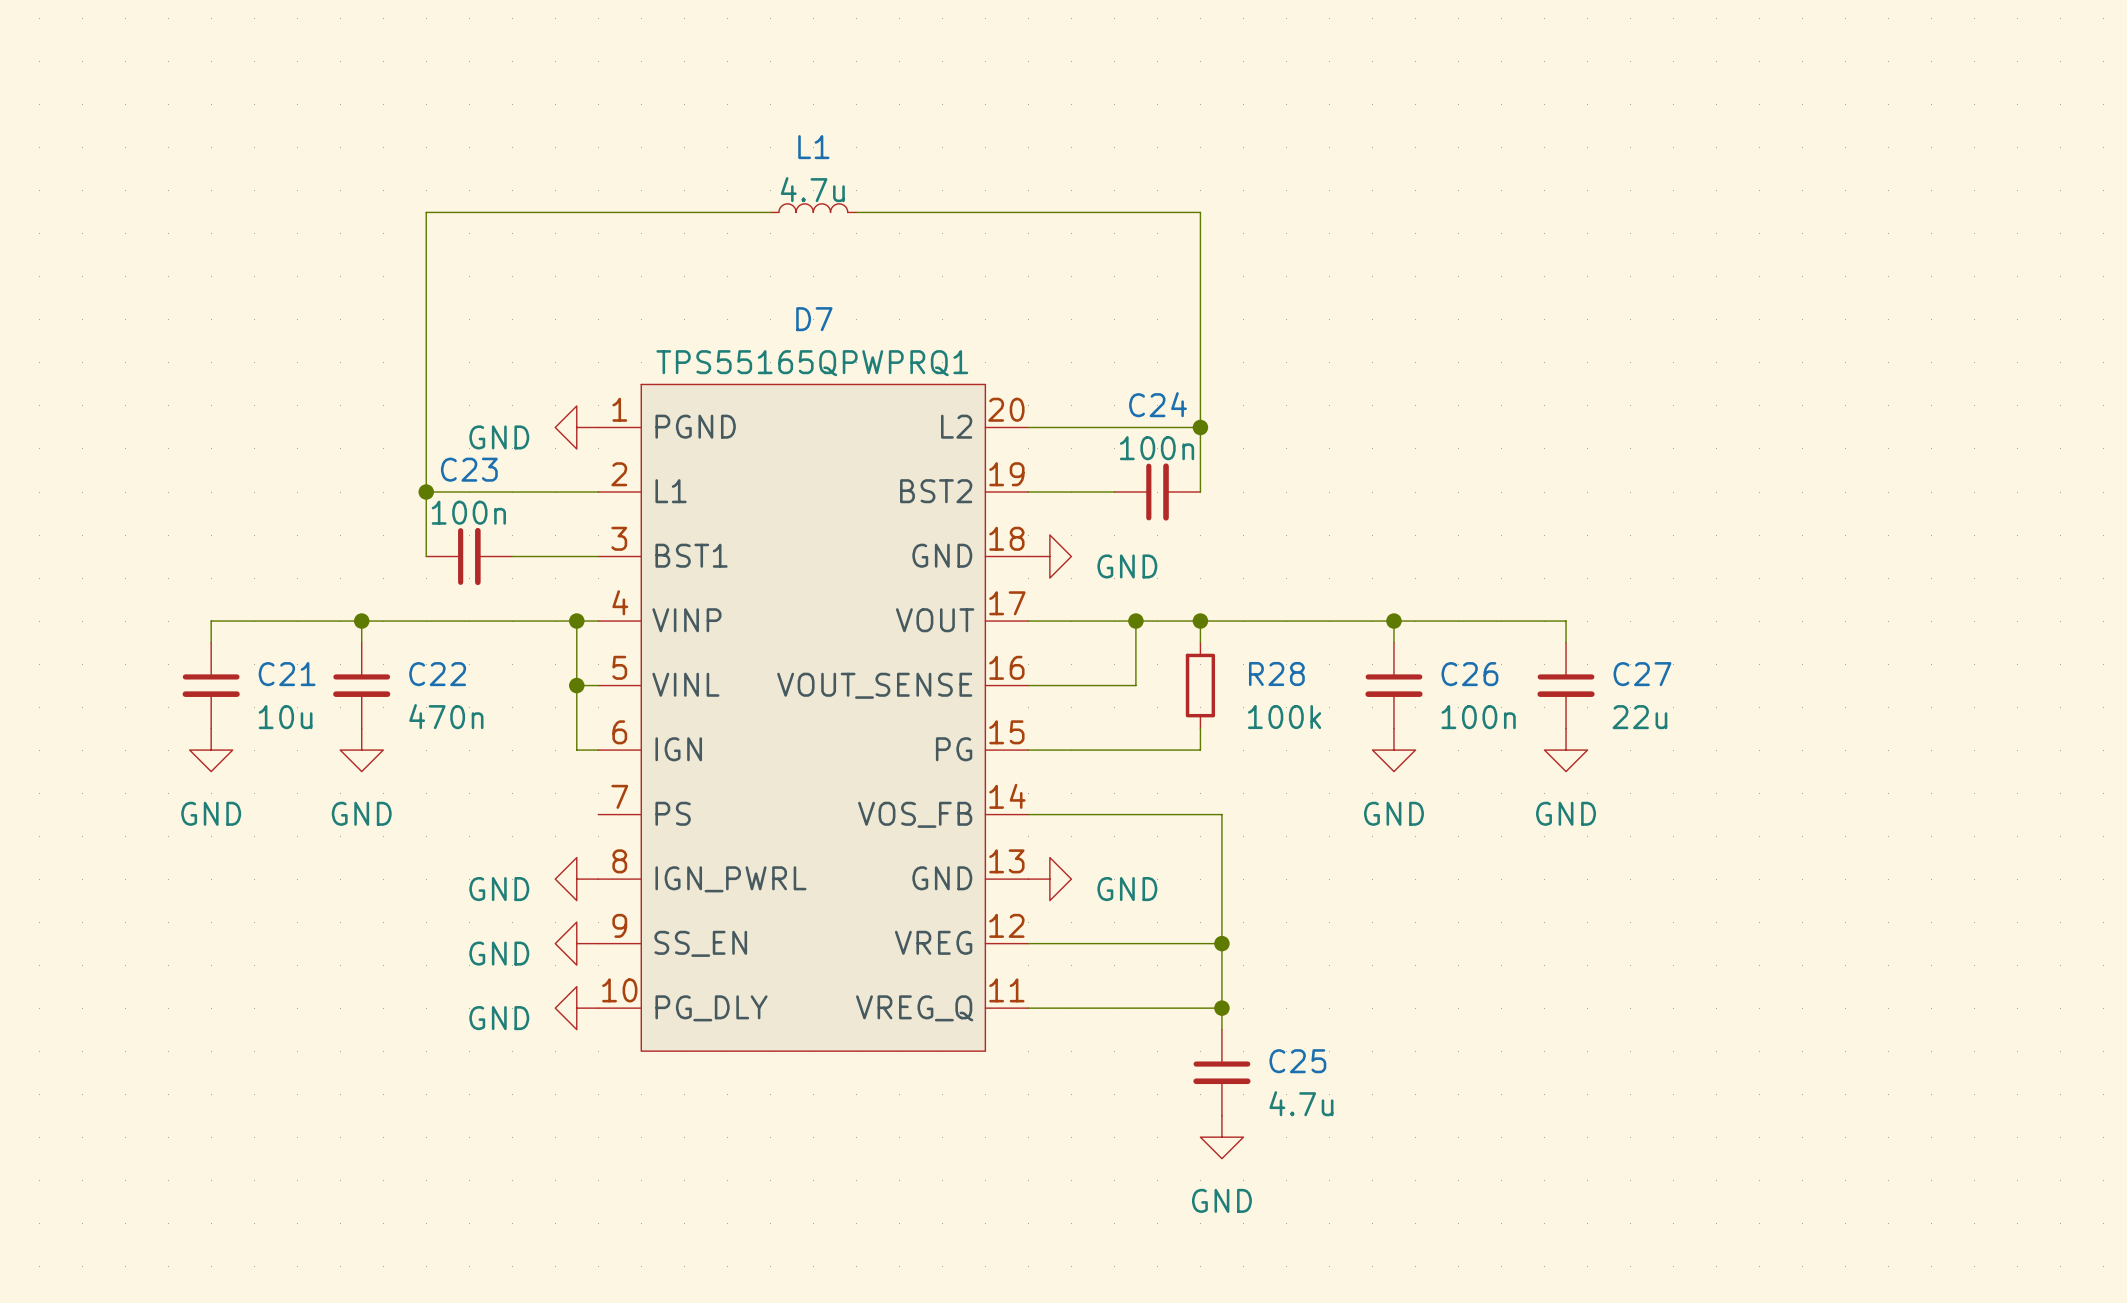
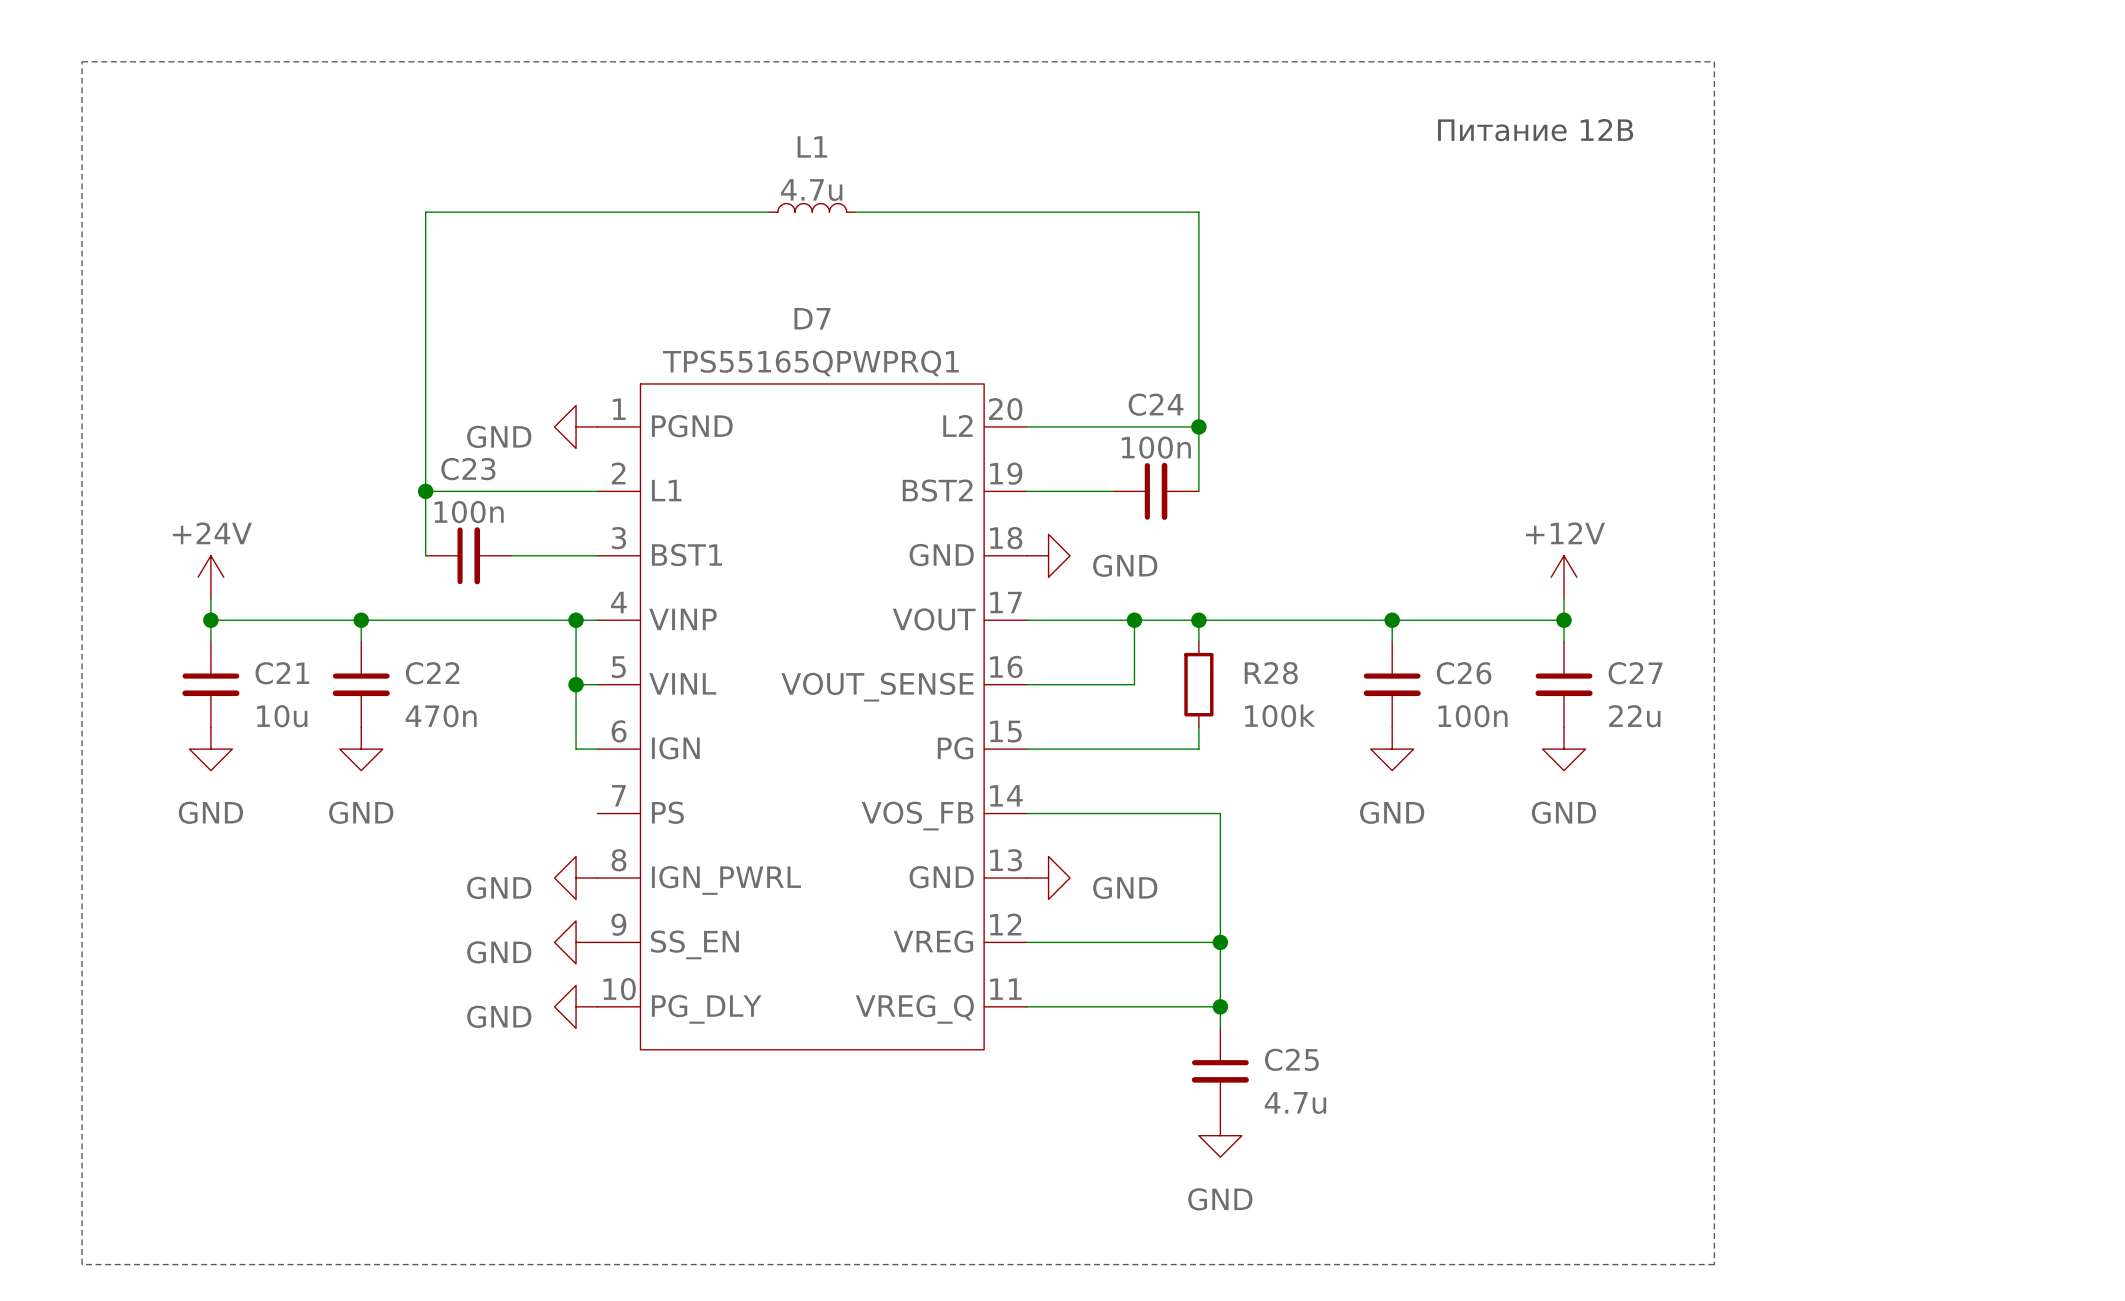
line: none -> (82, 61) (1714, 61) (1714, 1264) (82, 1264) (82, 61)
text: none -> Питание 12В (1535, 130)
power symbol: none -> +24V (210, 577)
power symbol: none -> +12V (1564, 577)
wire: none -> (210, 598) (210, 620)
wire: none -> (1564, 598) (1564, 620)
junction: none -> (210, 620)
junction: none -> (1564, 620)

